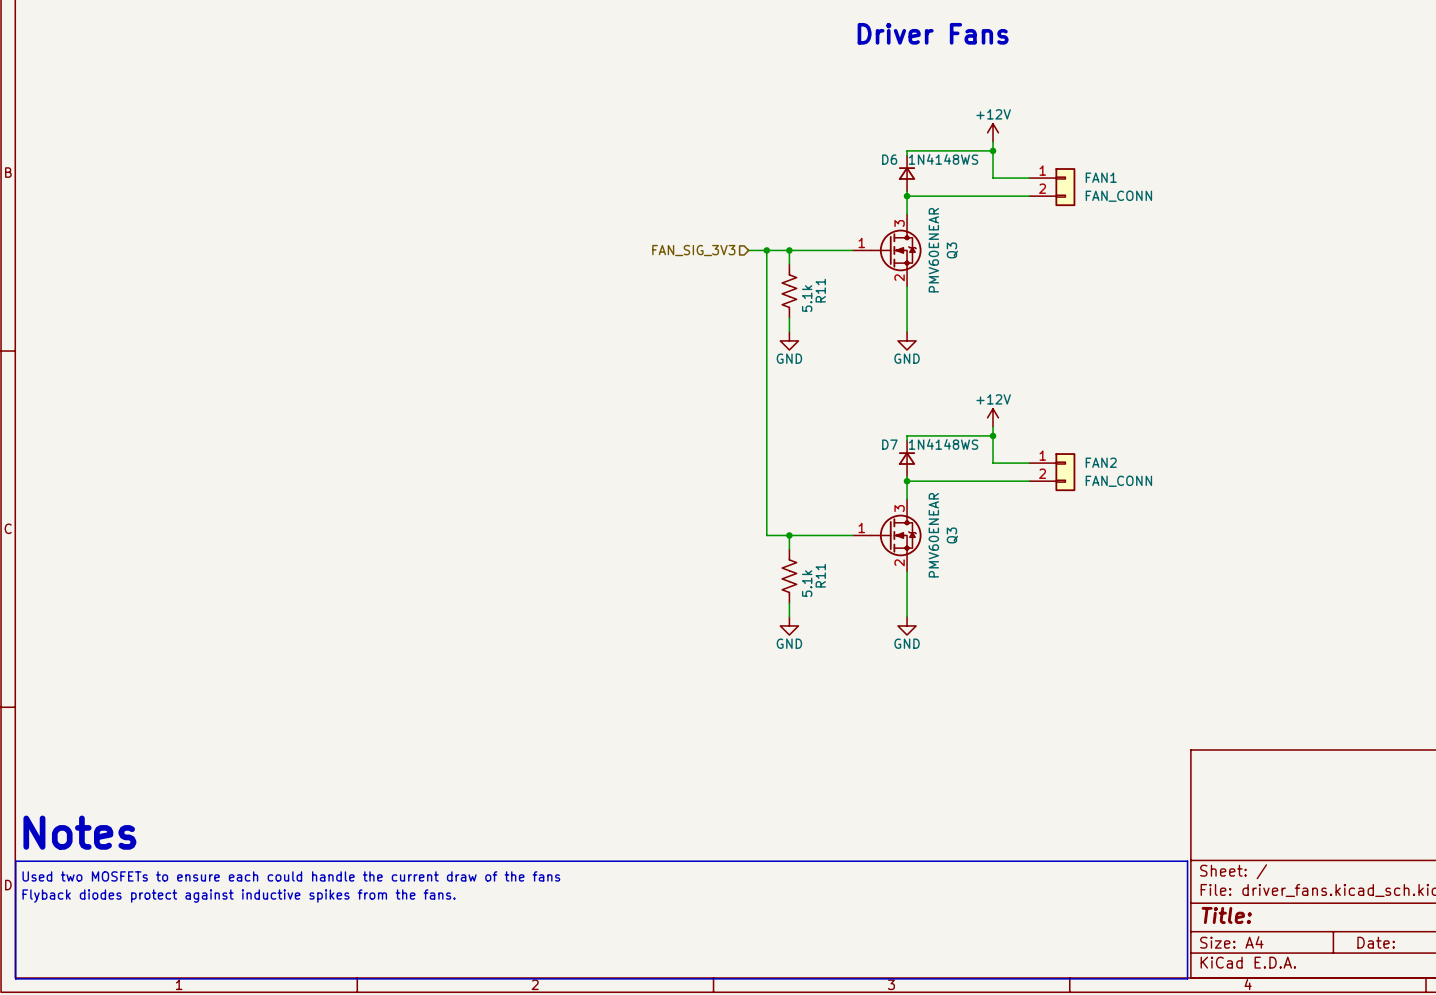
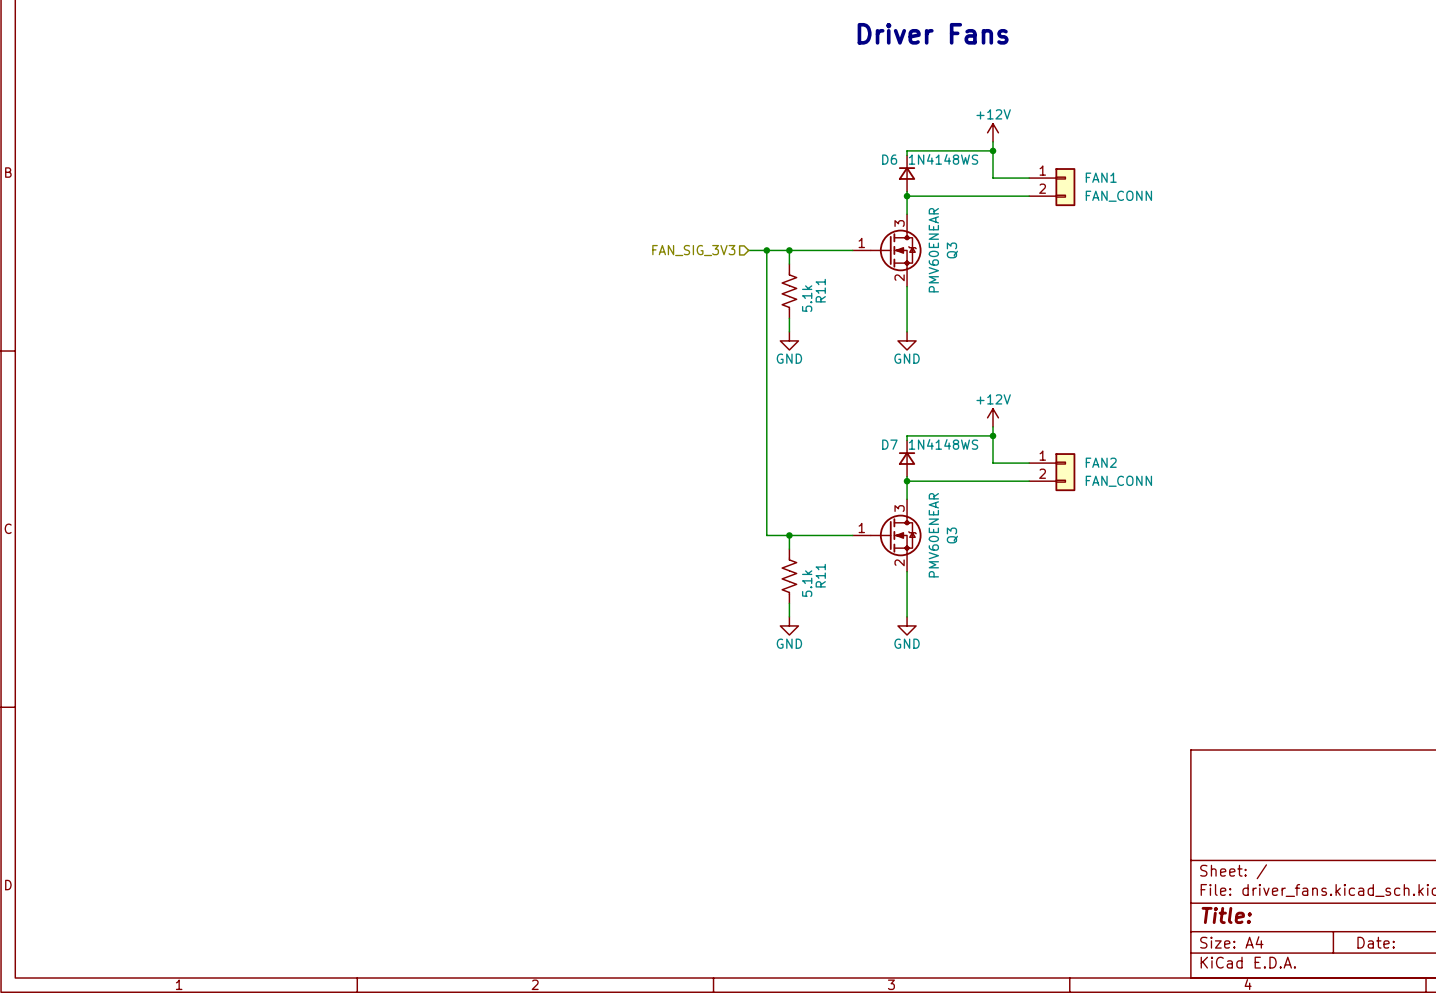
text: Notes (79, 832) -> none
line: (15, 861) (1187, 861) (1187, 978) (15, 978) (15, 861) -> none
text: Used two MOSFETs to ensure each could handle the current draw of the fans (291, 876) -> none
text: Flyback diodes protect against inductive spikes from the fans. (239, 896) -> none

